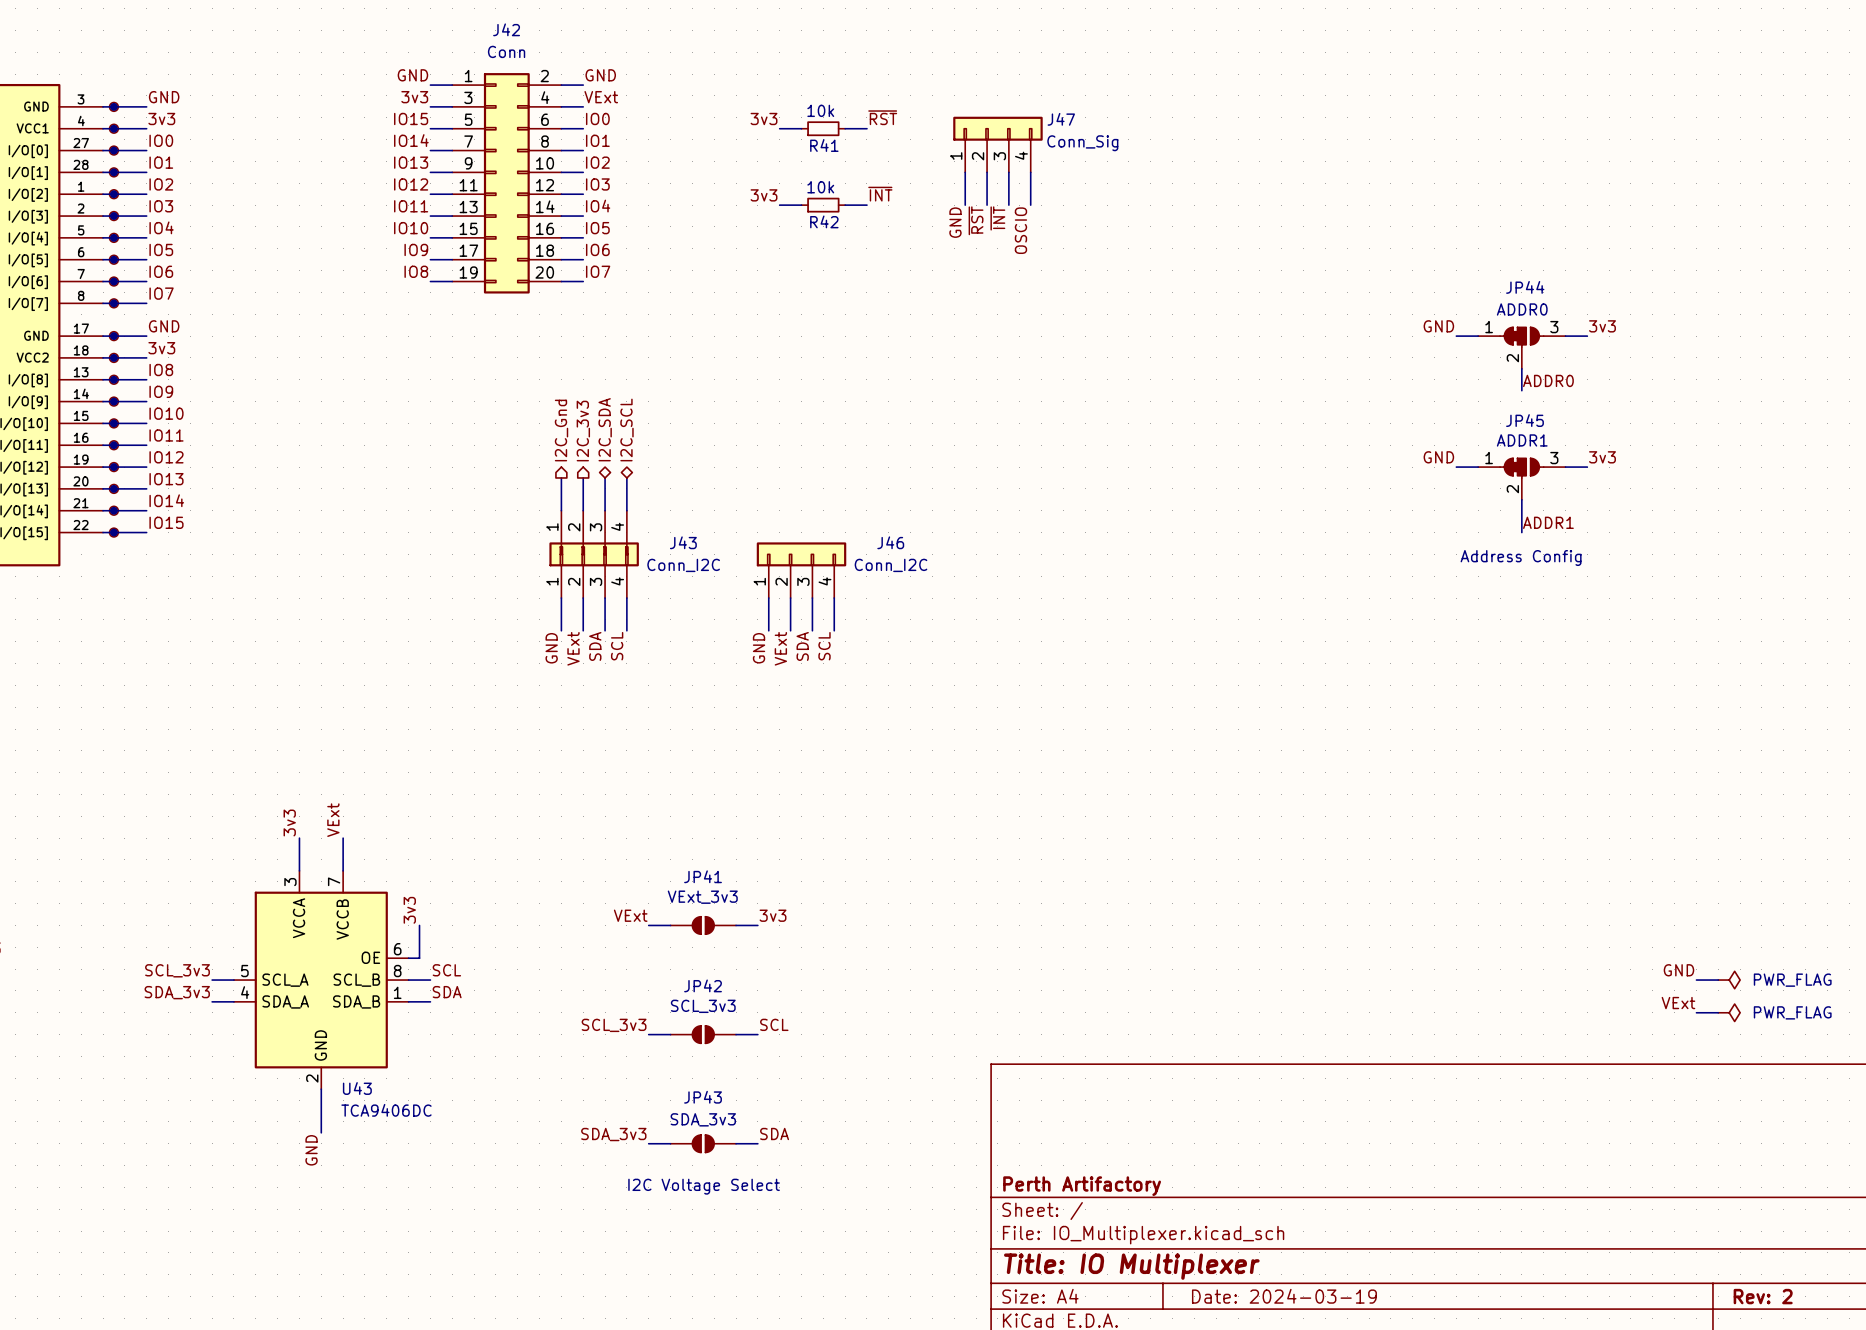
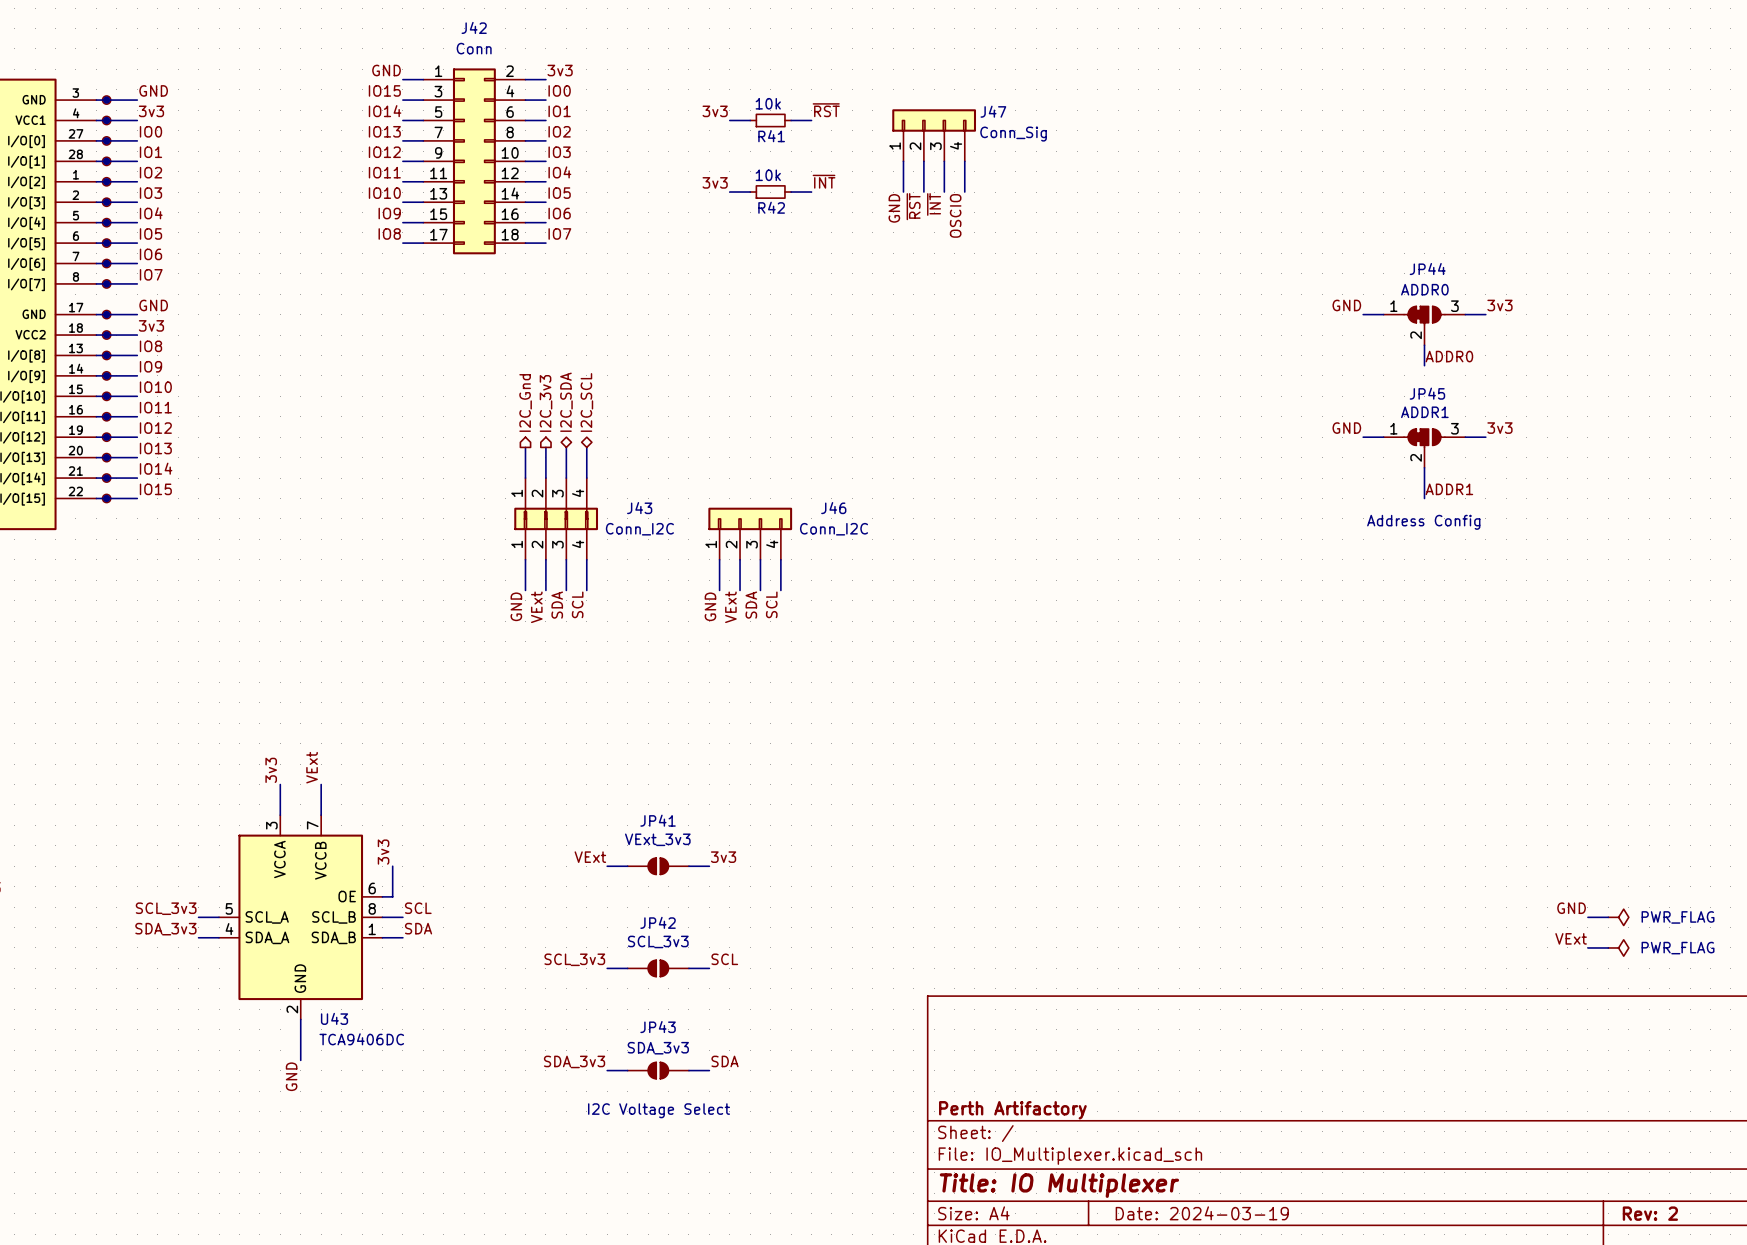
J42 symbol: [452, 73, 562, 294] -> [423, 68, 526, 255]
label: GND (600, 75) -> 3v3 (560, 70)
label: 3v3 (414, 97) -> IO15 (384, 90)
label: VExt (601, 97) -> IO0 (559, 90)
label: IO15 (411, 118) -> IO14 (385, 111)
label: IO0 (597, 118) -> IO1 (559, 111)
label: IO14 (411, 140) -> IO13 (384, 131)
label: IO1 (597, 140) -> IO2 (559, 131)
label: IO13 (411, 162) -> IO12 (384, 152)
label: IO2 (597, 162) -> IO3 (559, 152)
label: IO12 (411, 184) -> IO11 (384, 172)
label: IO3 (597, 184) -> IO4 (559, 172)
label: IO11 (411, 206) -> IO10 (384, 193)
label: IO4 (598, 206) -> IO5 (559, 193)
label: IO10 (411, 228) -> IO9 (389, 213)
label: IO5 (597, 228) -> IO6 (559, 213)
label: IO9 (416, 249) -> IO8 (389, 233)
label: IO6 (597, 249) -> IO7 (559, 233)
label: IO8 (416, 271) -> none
label: IO7 (598, 271) -> none
wire: (430, 281) (452, 281) -> none
wire: (561, 281) (583, 281) -> none

